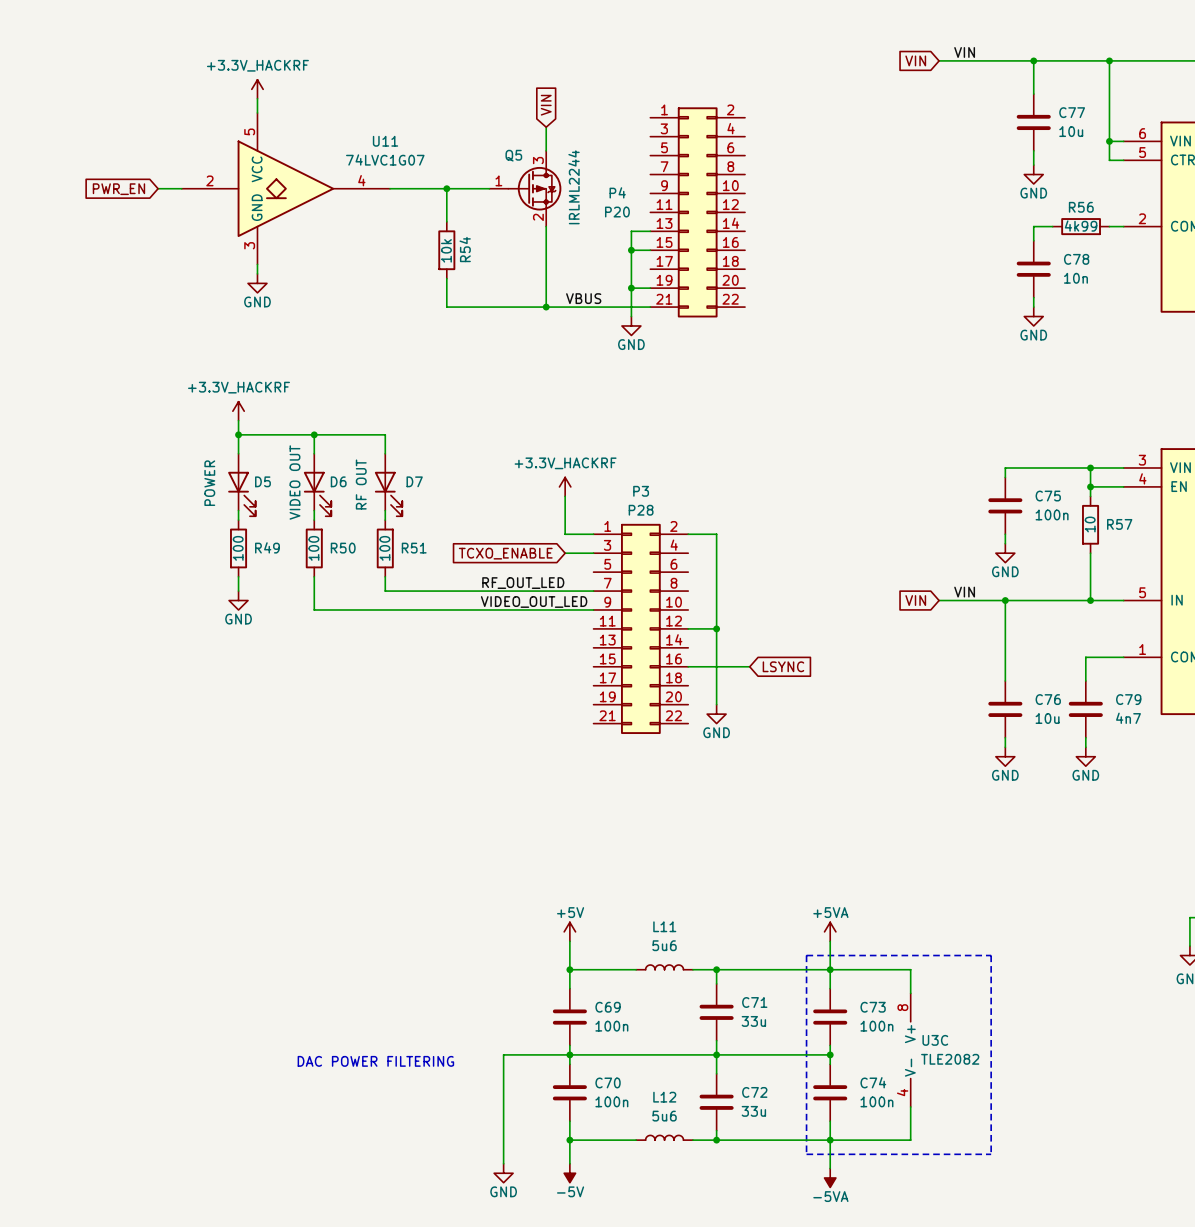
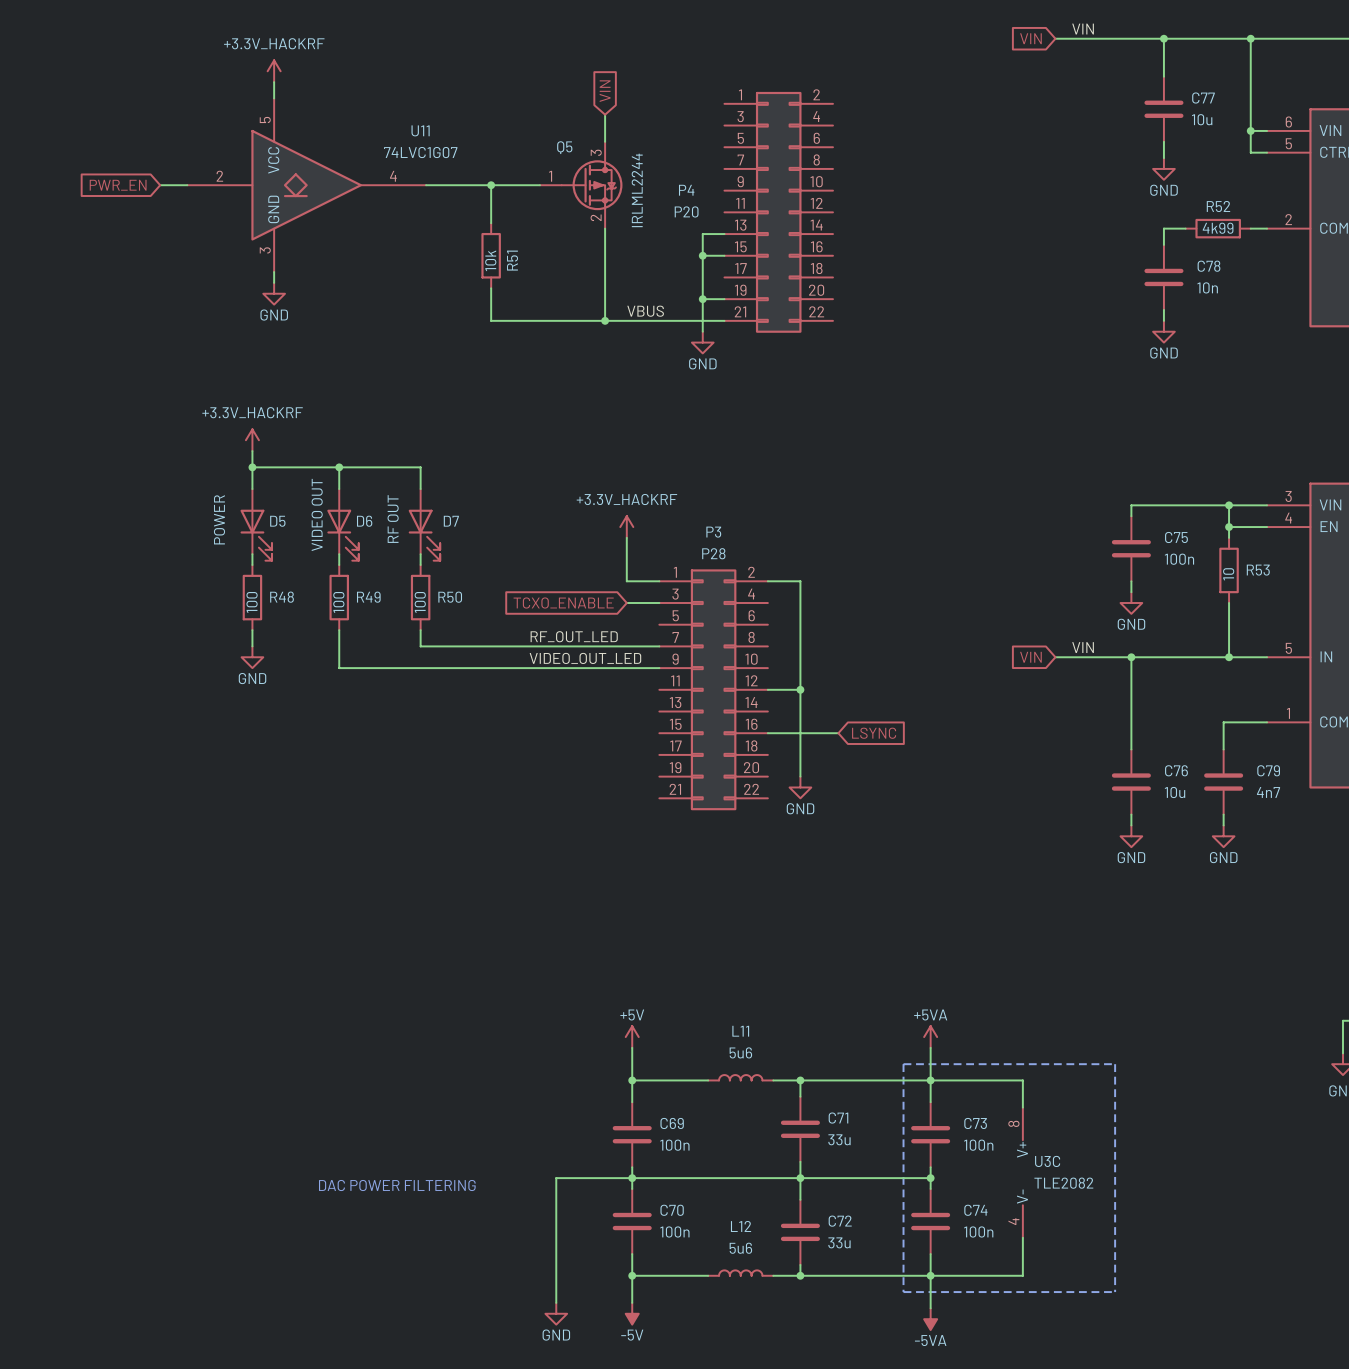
R56 name: R56 (1081, 207) -> R52 (1218, 206)
R54 name: R54 (465, 249) -> R51 (512, 260)
R57 name: R57 (1119, 524) -> R53 (1258, 570)
R49 name: R49 (267, 547) -> R48 (282, 597)
R50 name: R50 (343, 548) -> R49 (368, 597)
R51 name: R51 (414, 548) -> R50 (450, 597)

